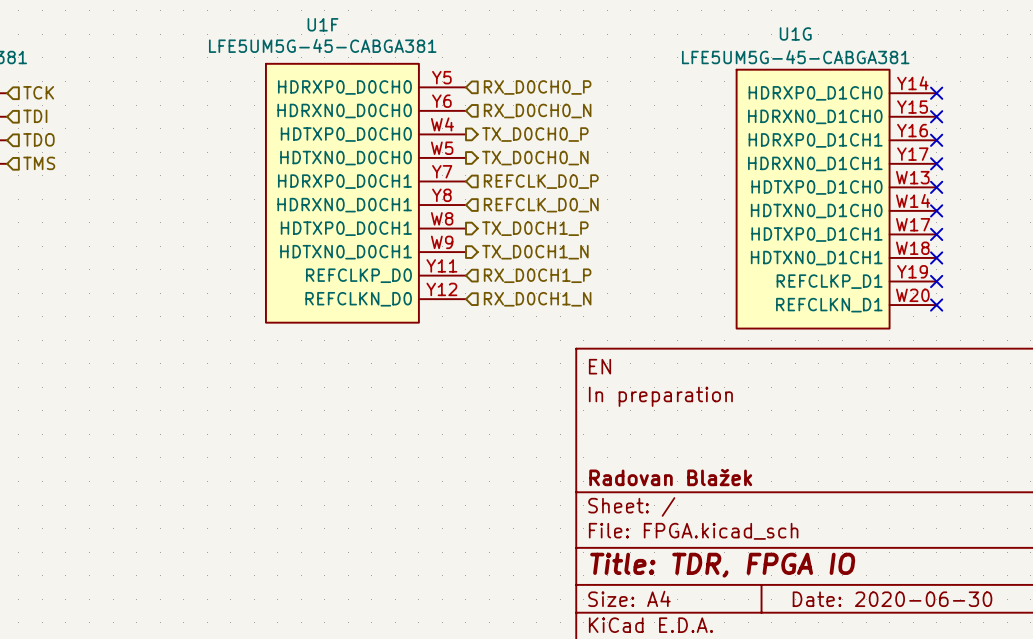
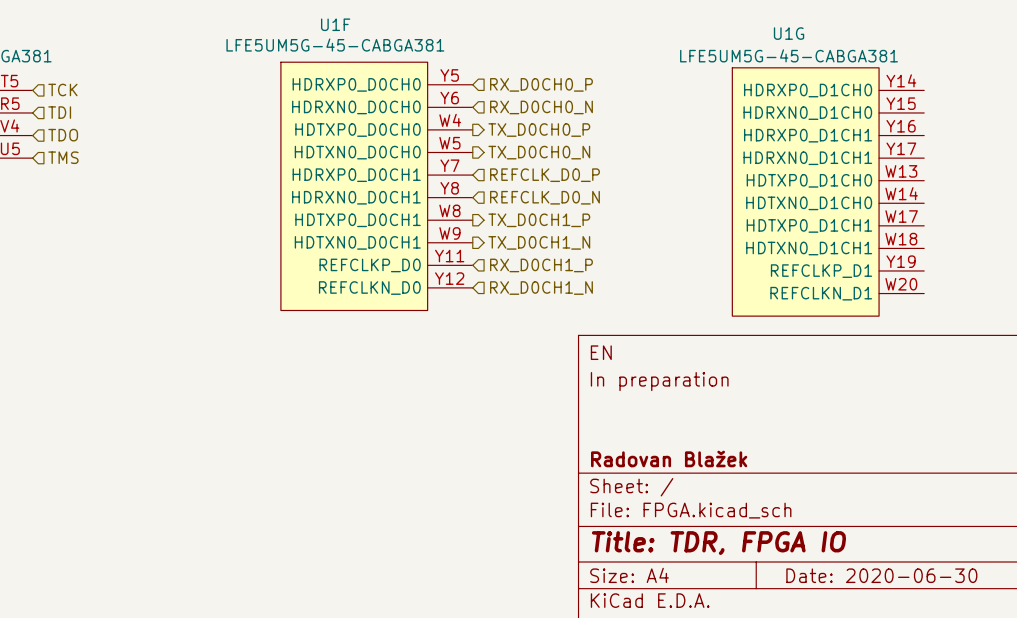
no-connect mark: (936, 93) -> none
no-connect mark: (936, 116) -> none
no-connect mark: (936, 140) -> none
no-connect mark: (936, 163) -> none
no-connect mark: (936, 187) -> none
no-connect mark: (936, 210) -> none
no-connect mark: (936, 234) -> none
no-connect mark: (936, 257) -> none
no-connect mark: (936, 281) -> none
no-connect mark: (936, 305) -> none

